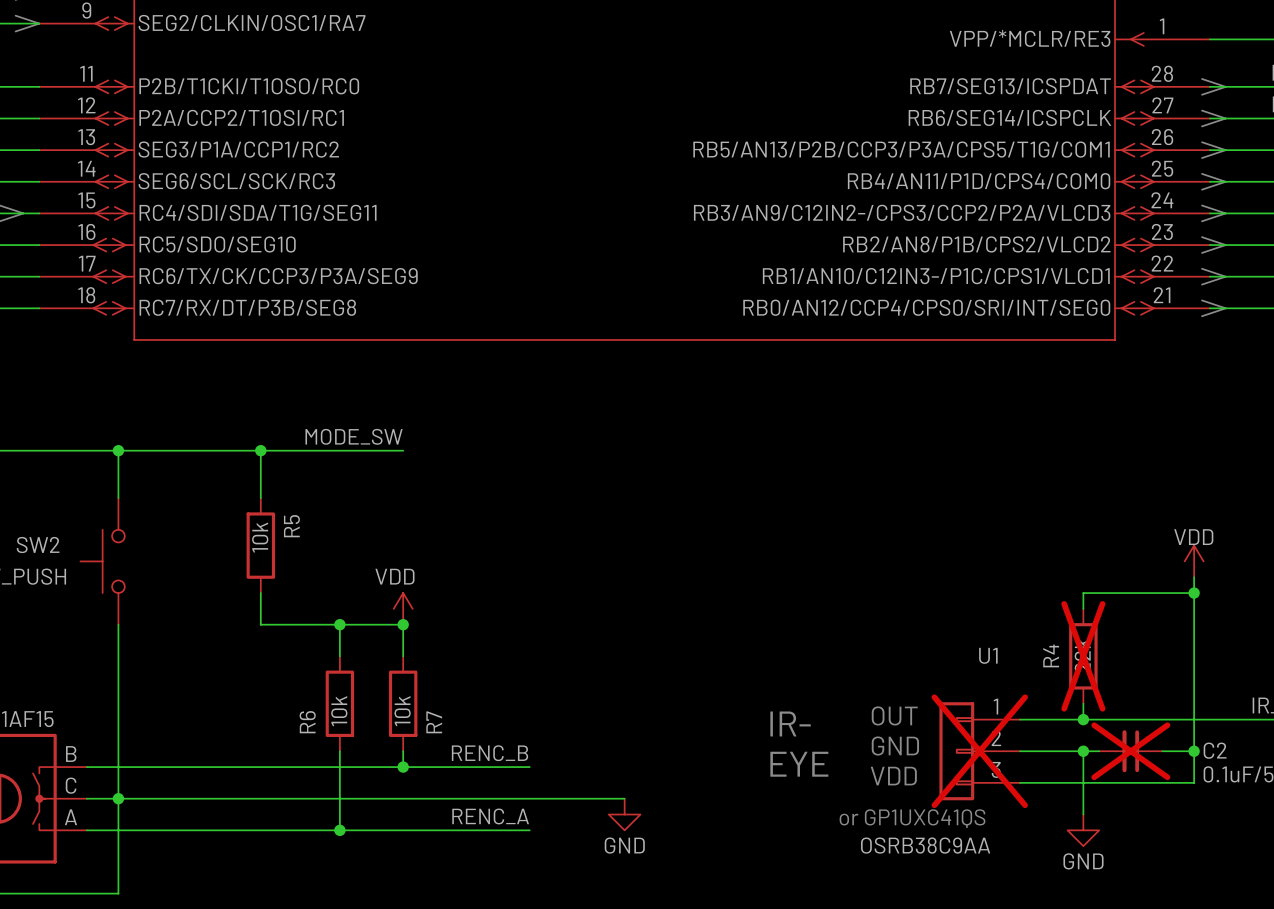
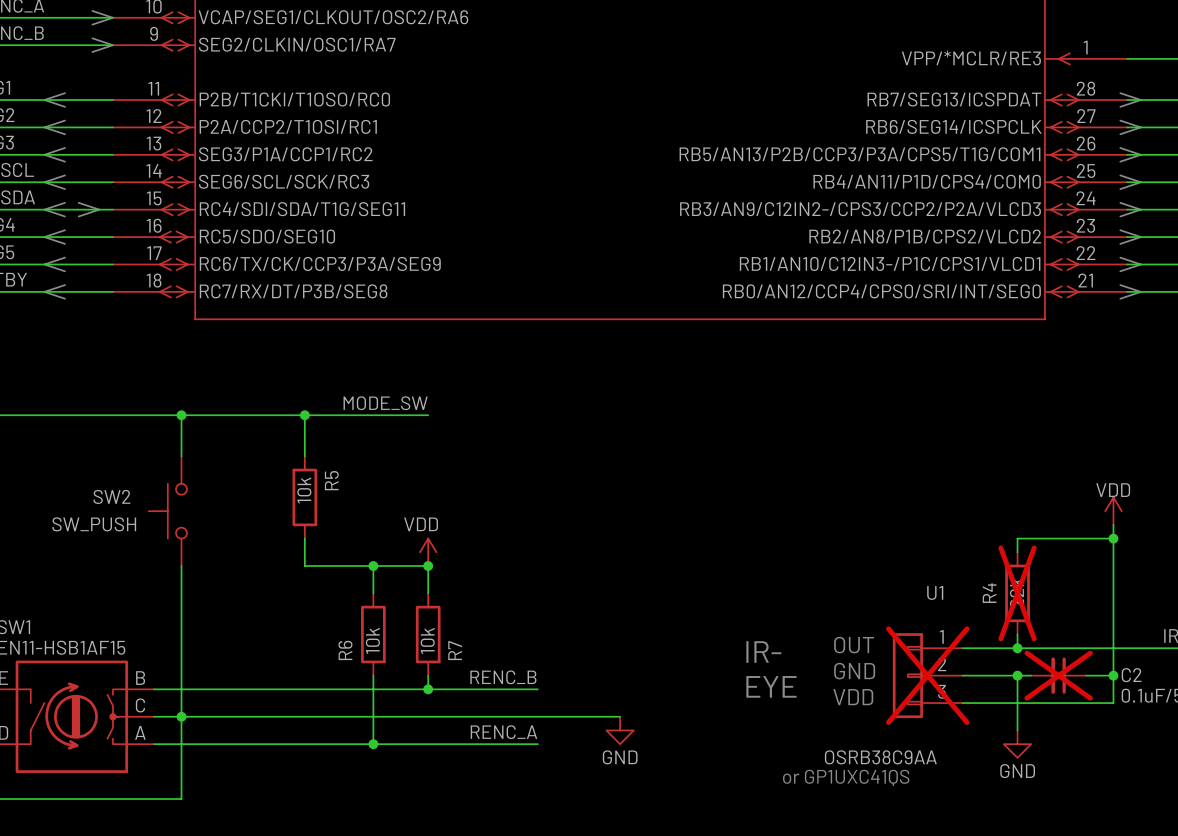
text position: or GP1UXC41QS (912, 818) -> or GP1UXC41QS (846, 777)

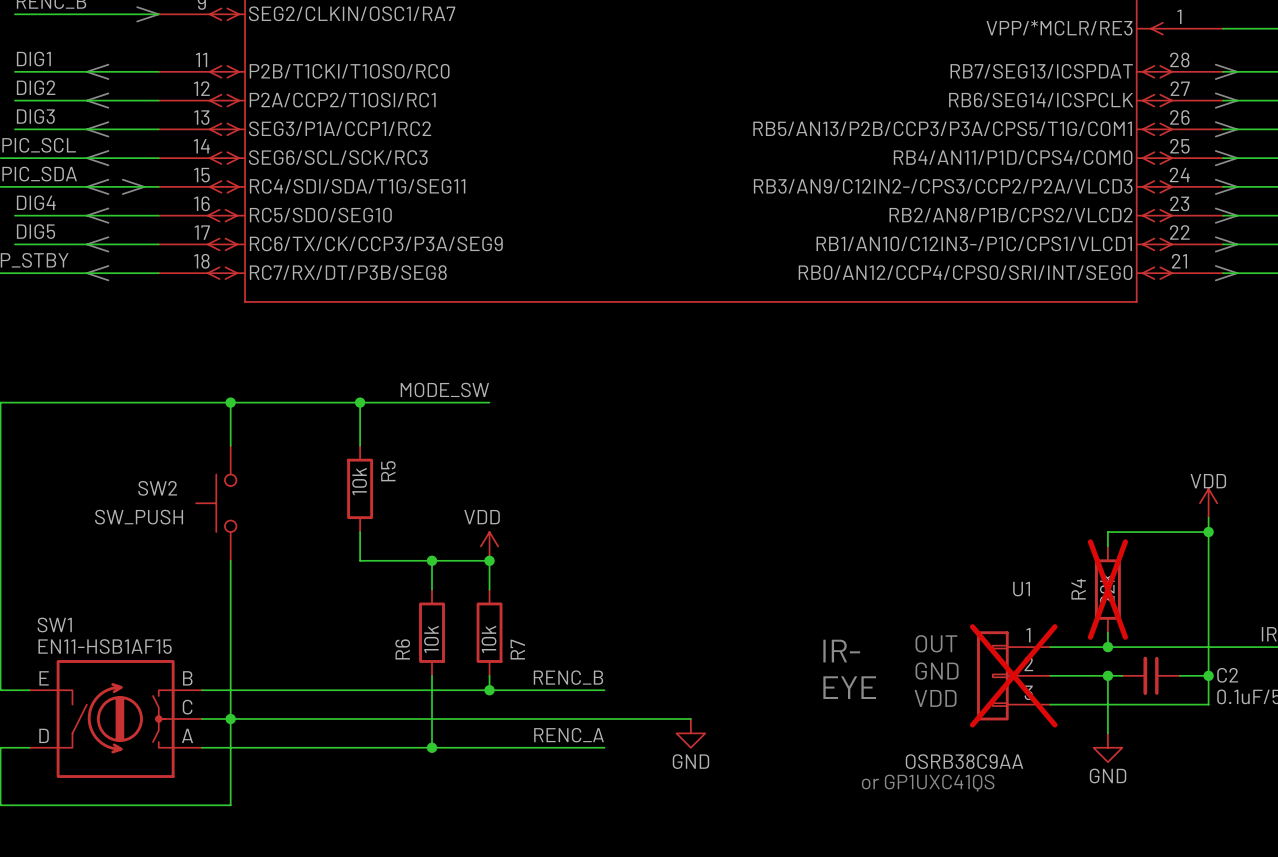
C2 do-not-place cross: (1058, 675) -> none

